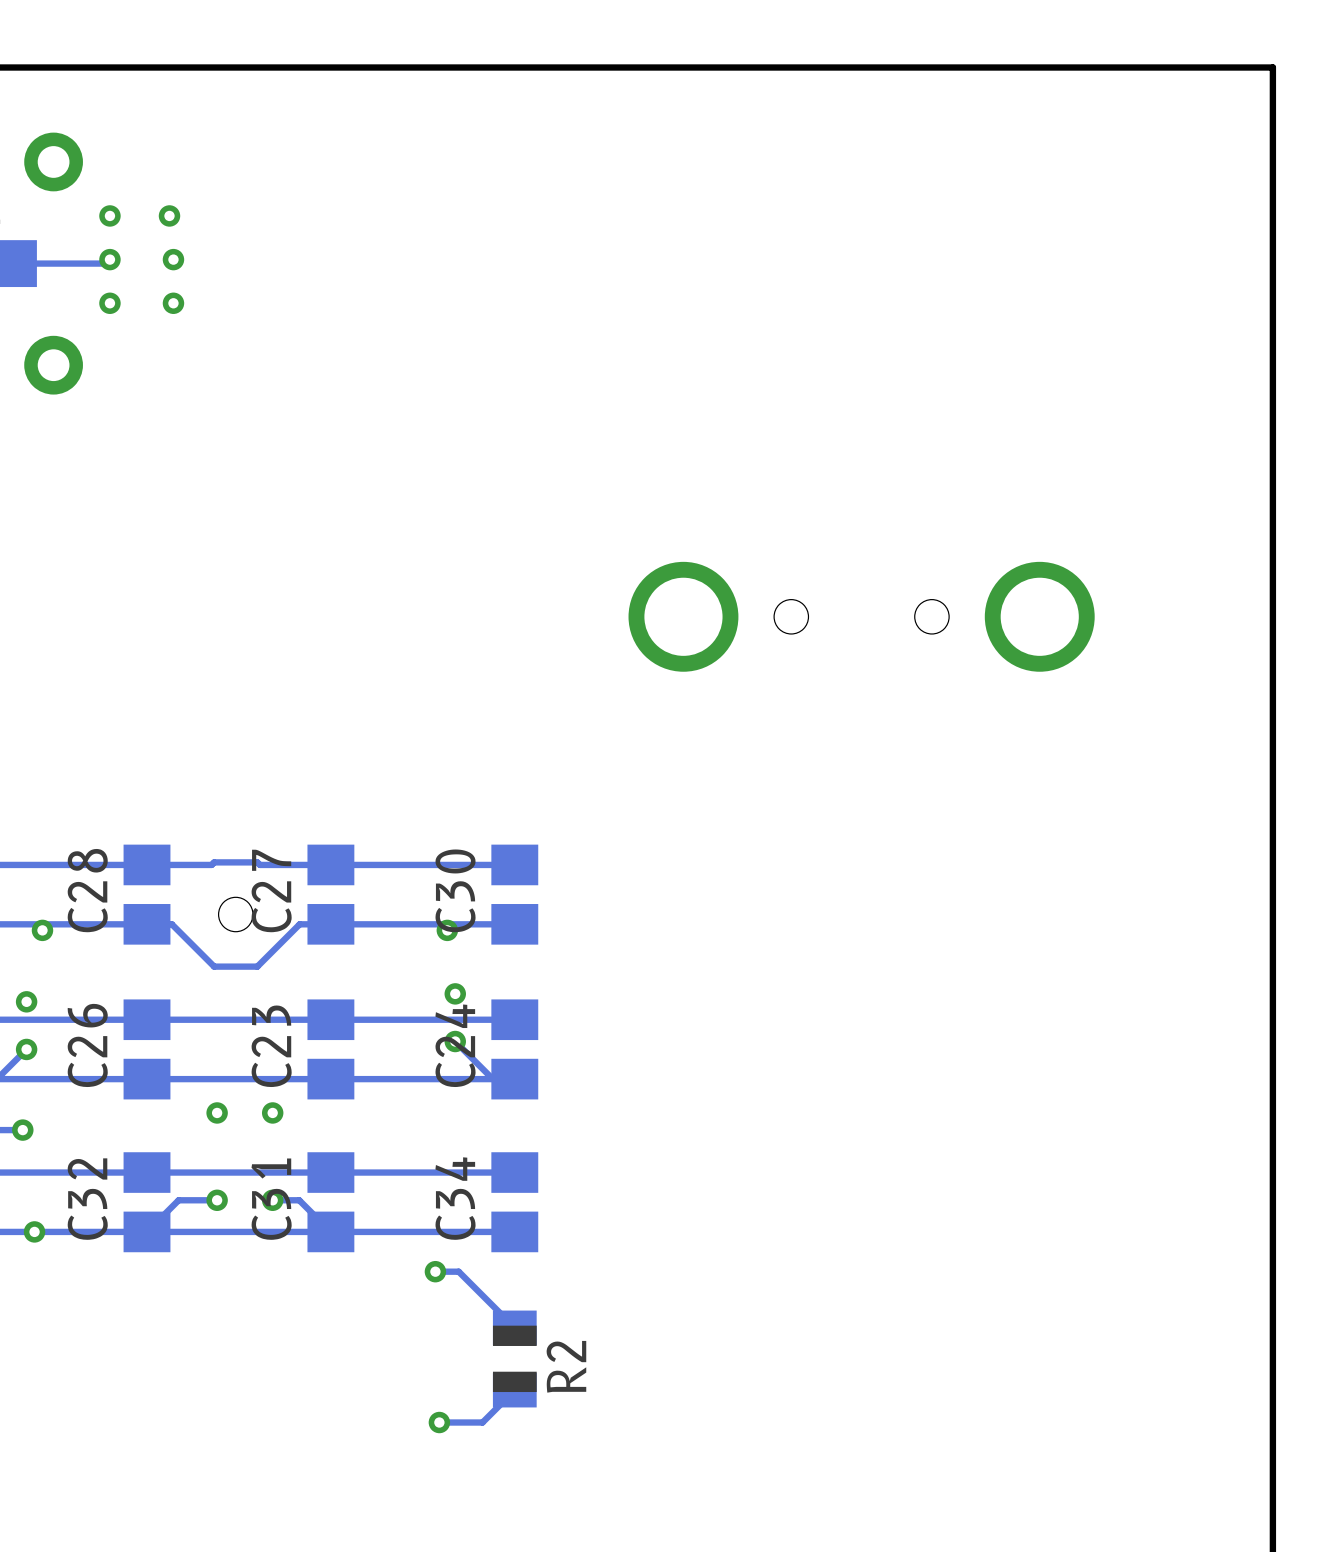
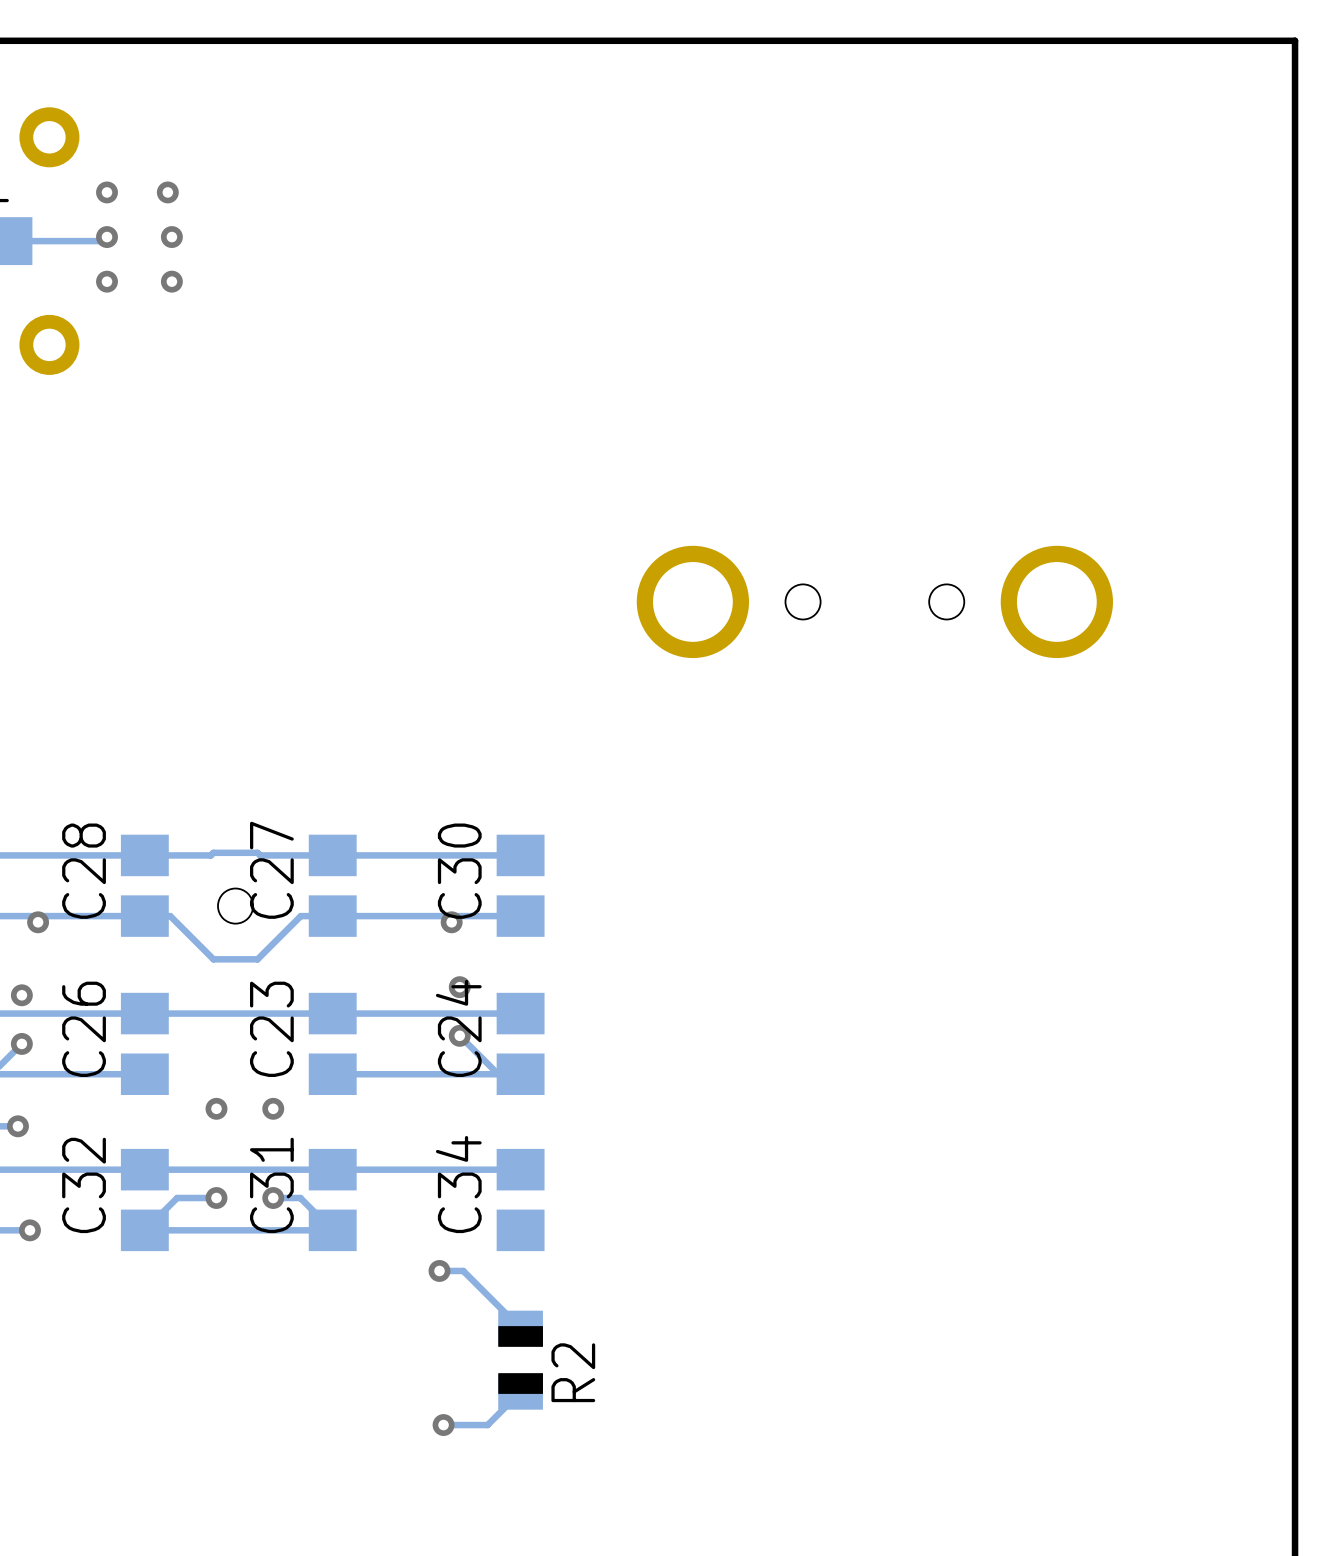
track: (330, 1079) (147, 1079) -> none
track: (147, 1231) (34, 1231) -> none
track: (514, 1231) (330, 1231) -> none

